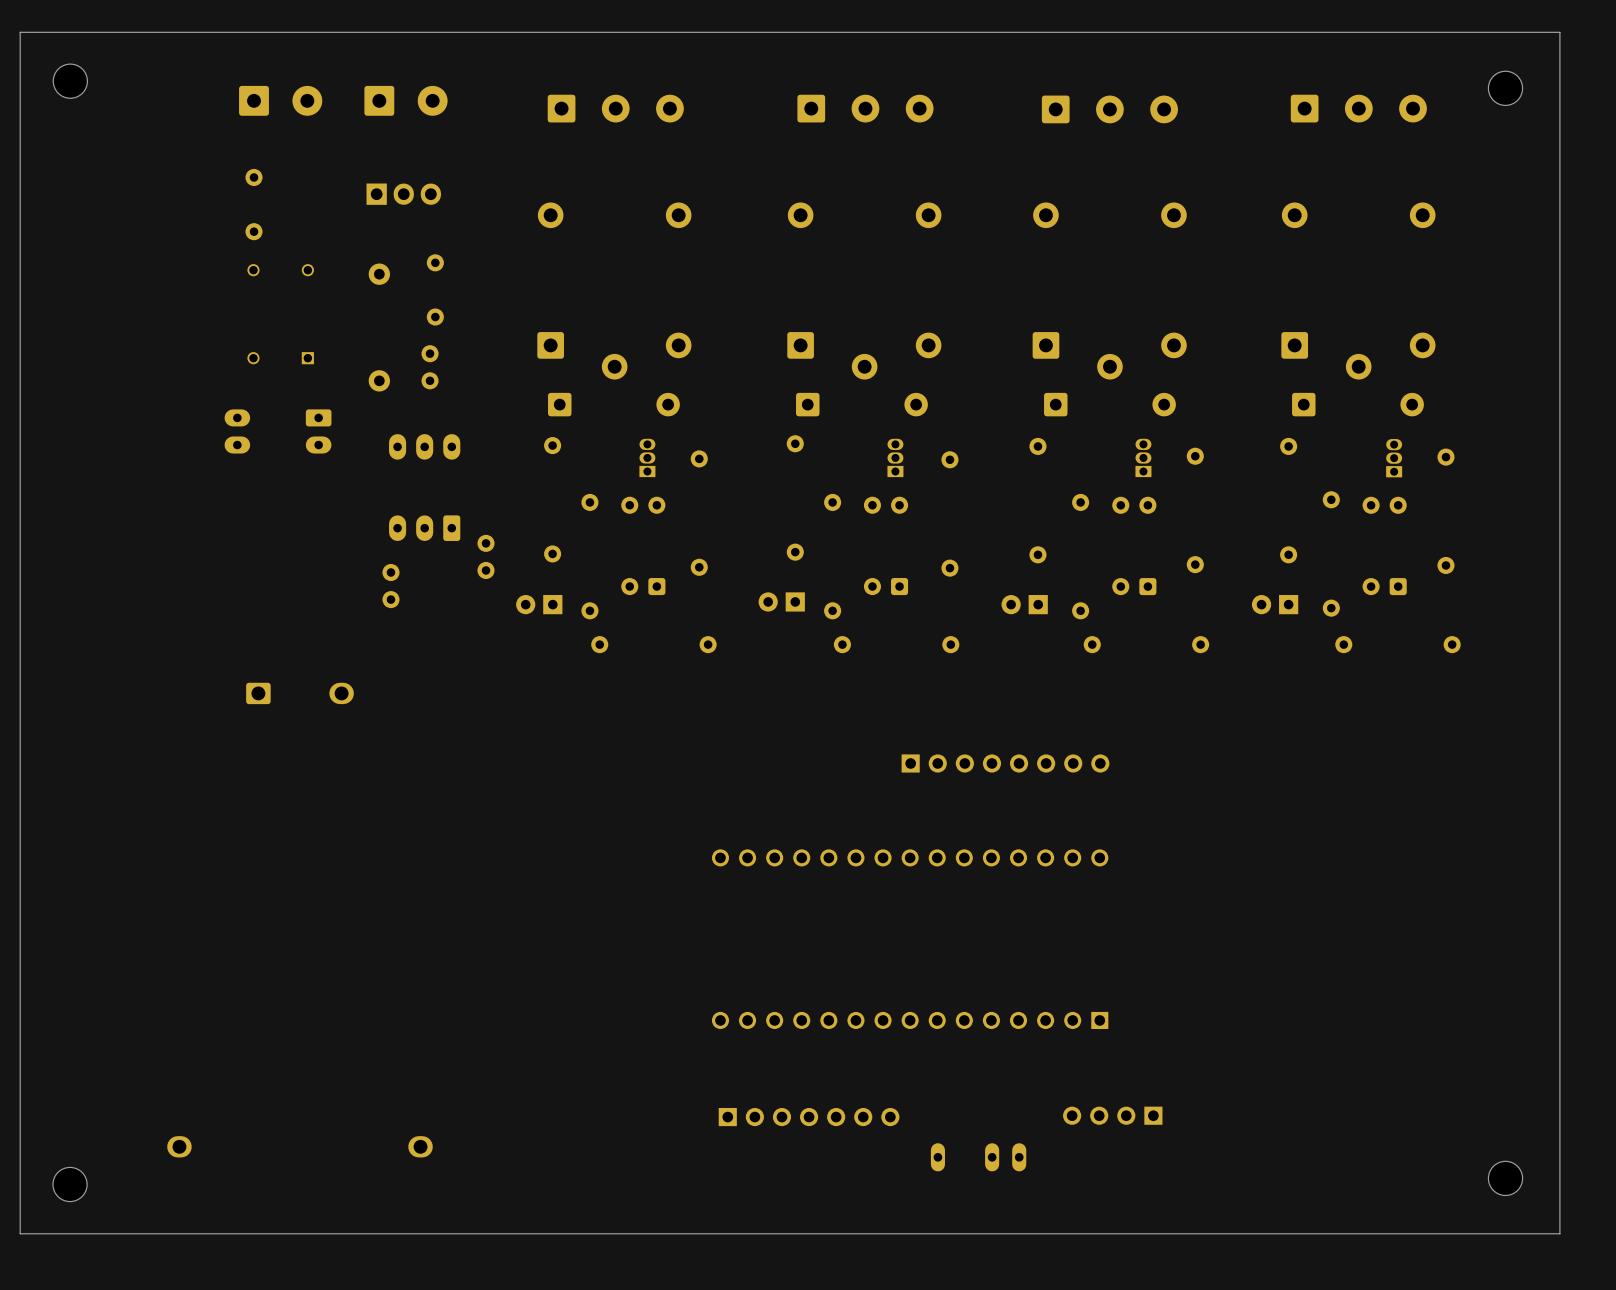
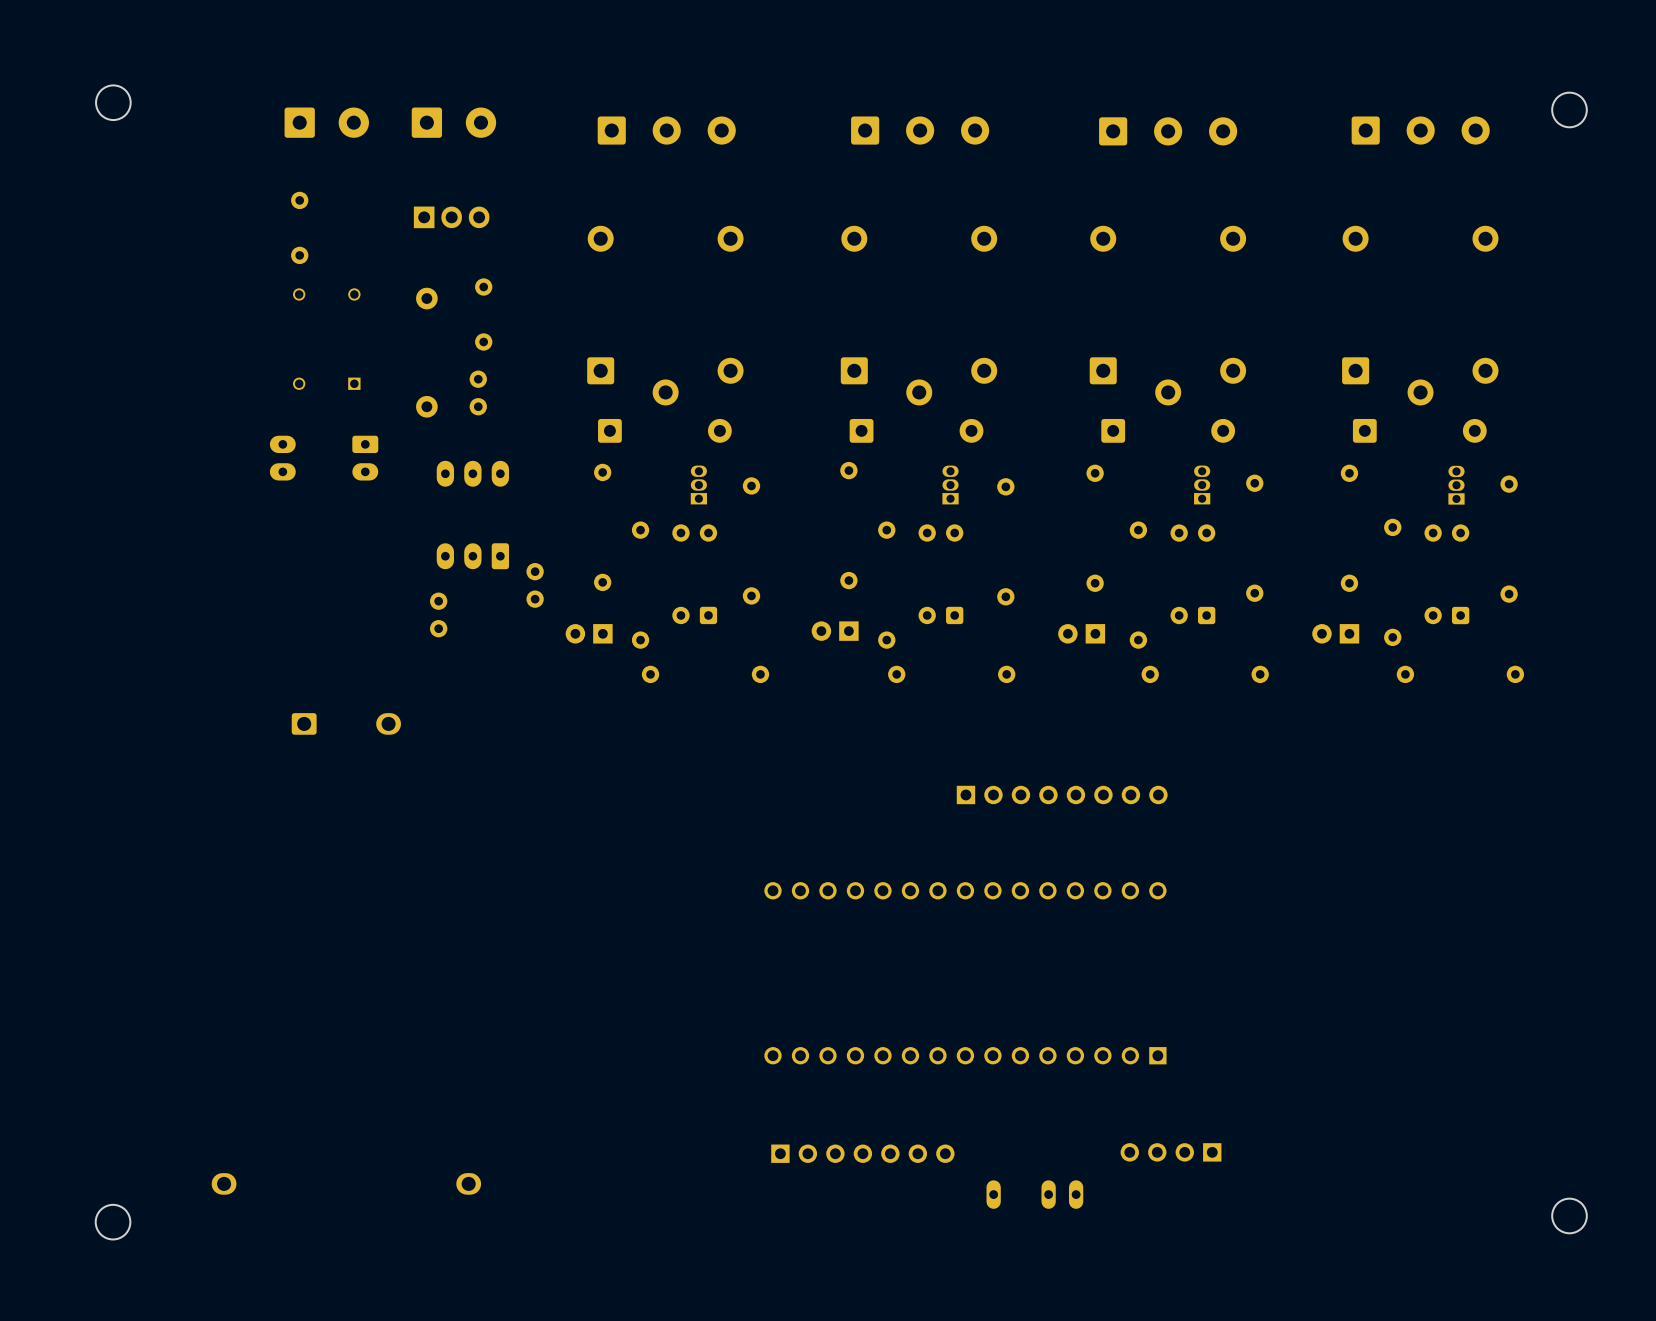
board edge: (1559, 32) (20, 32) (20, 1233) (1559, 1233) (1559, 32) -> none

